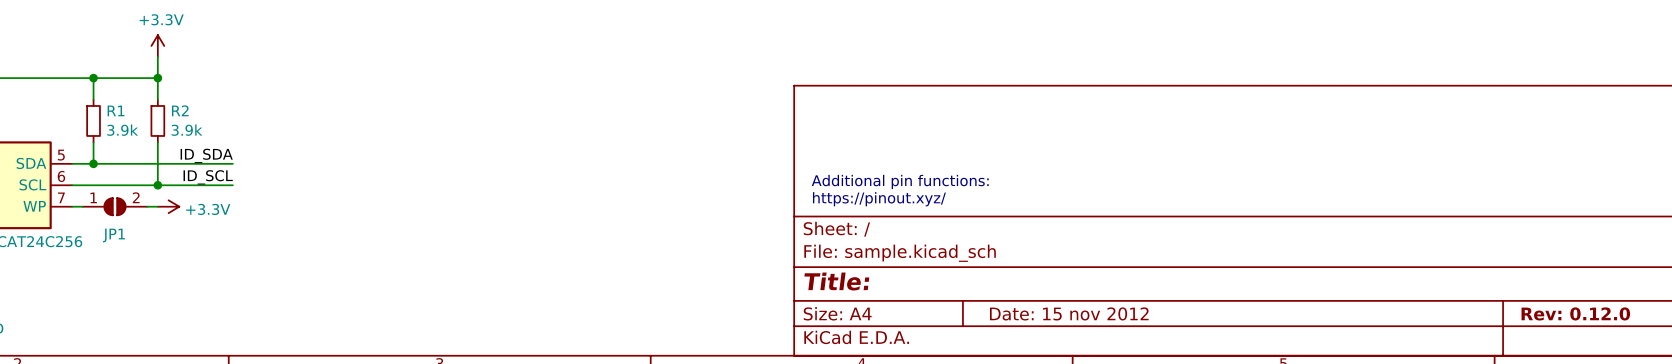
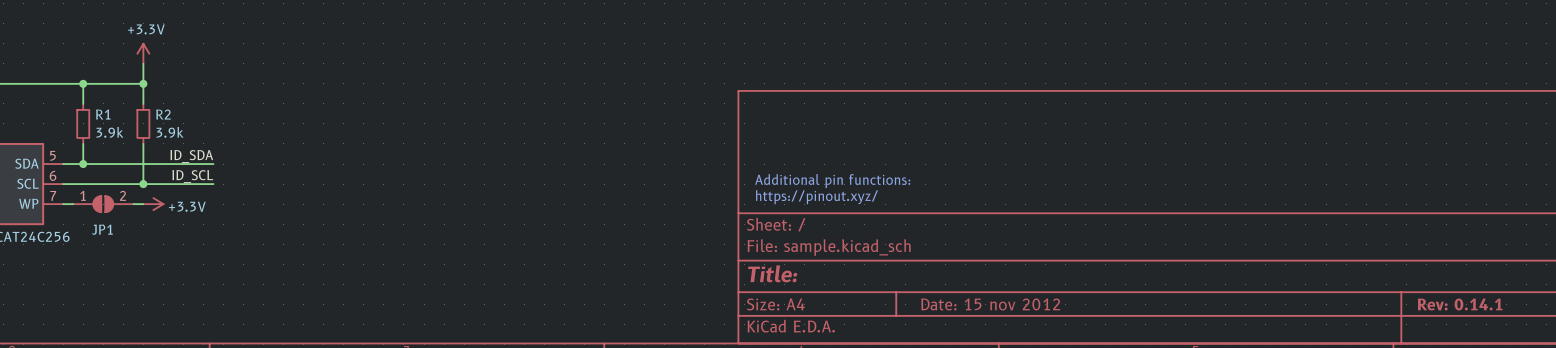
title block: Rev: 0.12.0 (1575, 313) -> Rev: 0.14.1 (1460, 304)

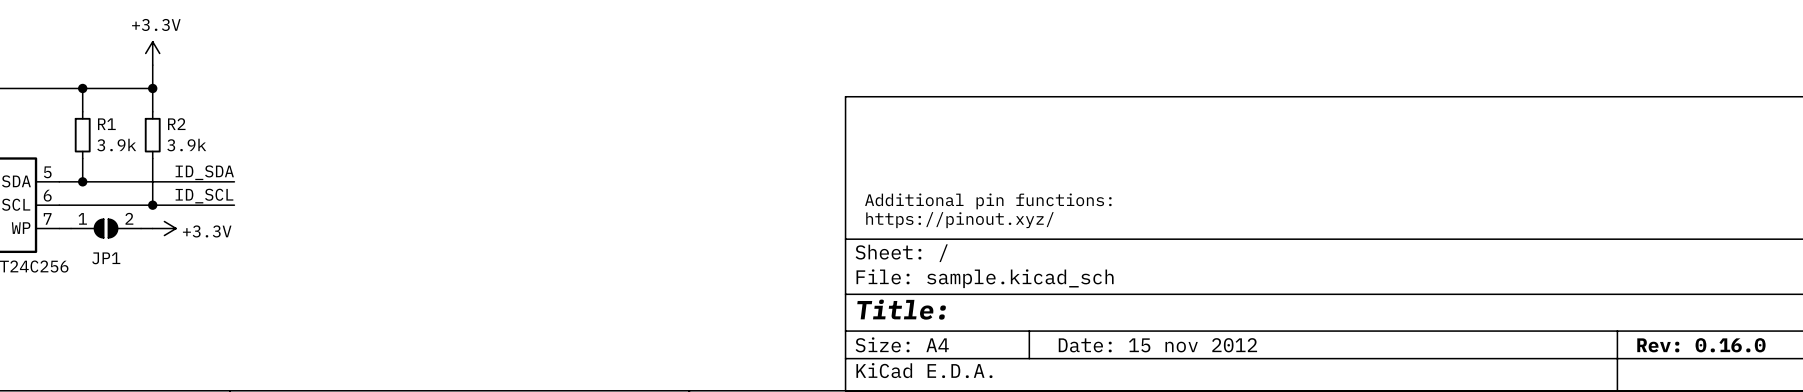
title block: Rev: 0.14.1 (1460, 304) -> Rev: 0.16.0 (1701, 345)

